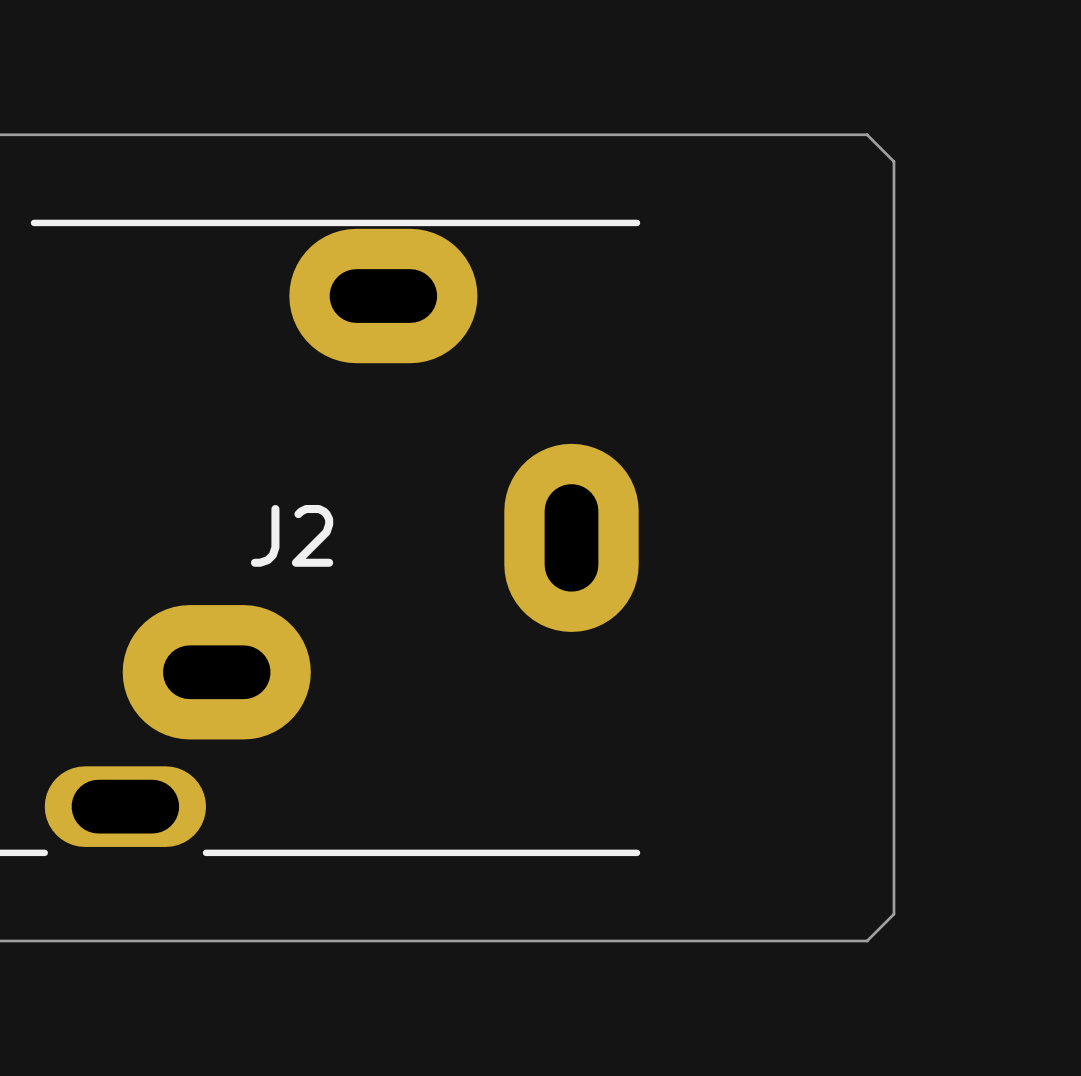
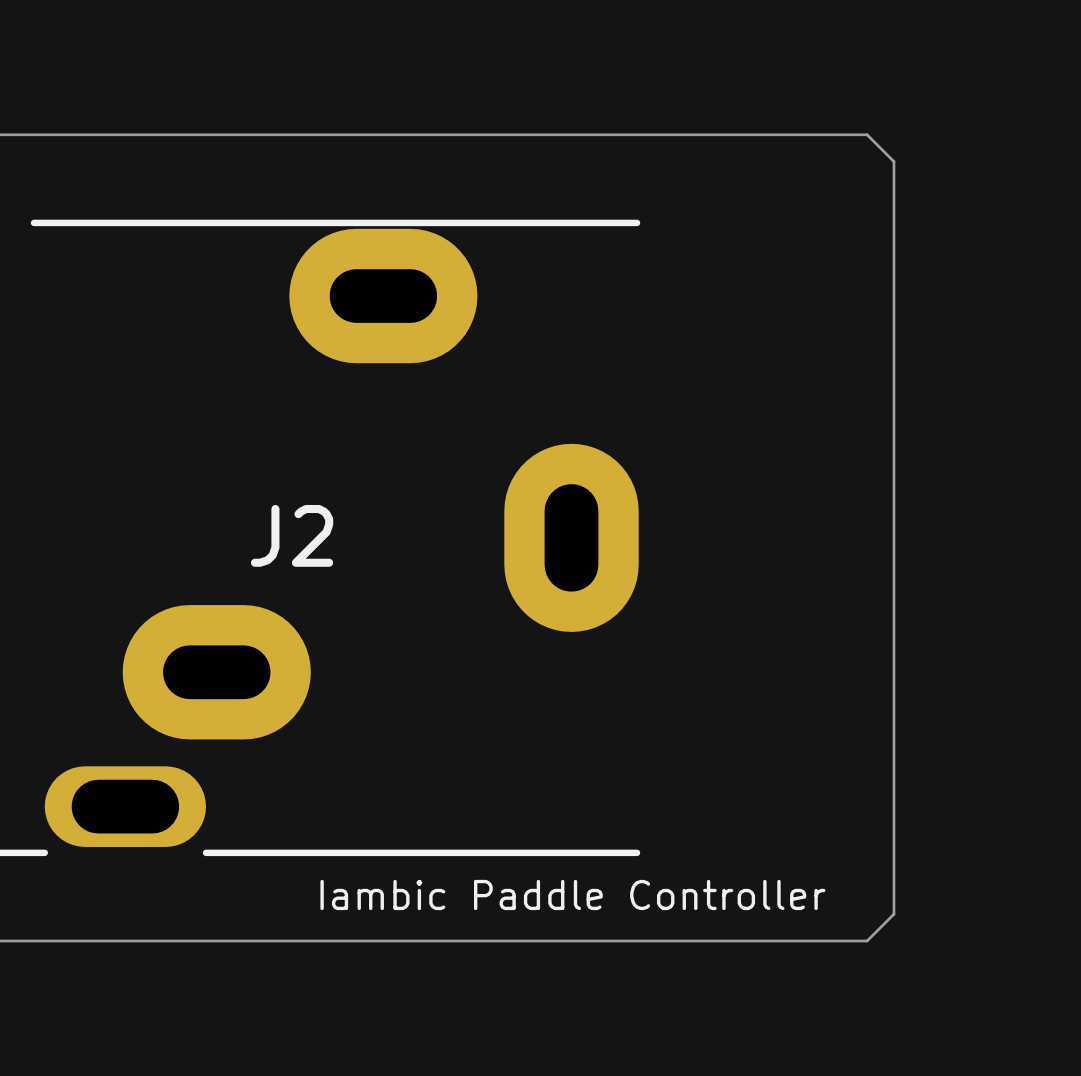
text: none -> Iambic Paddle Controller (572, 894)

